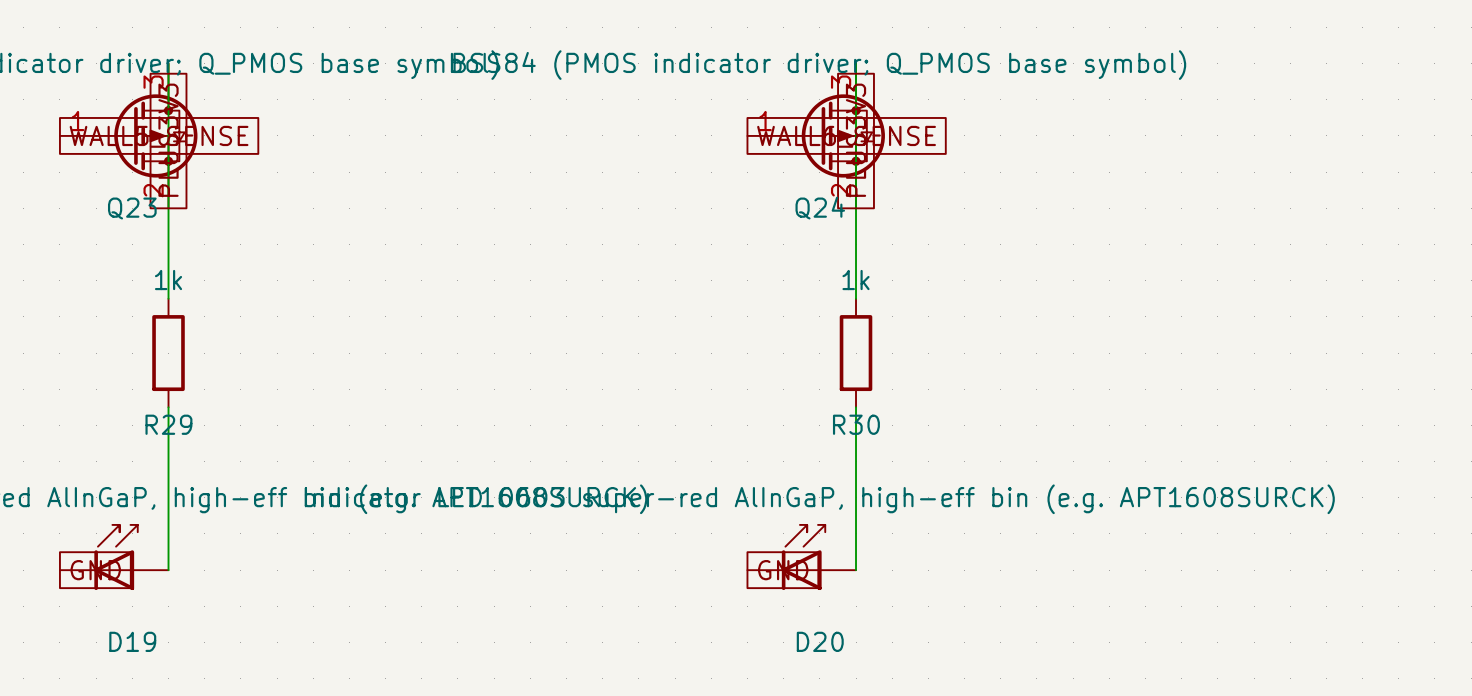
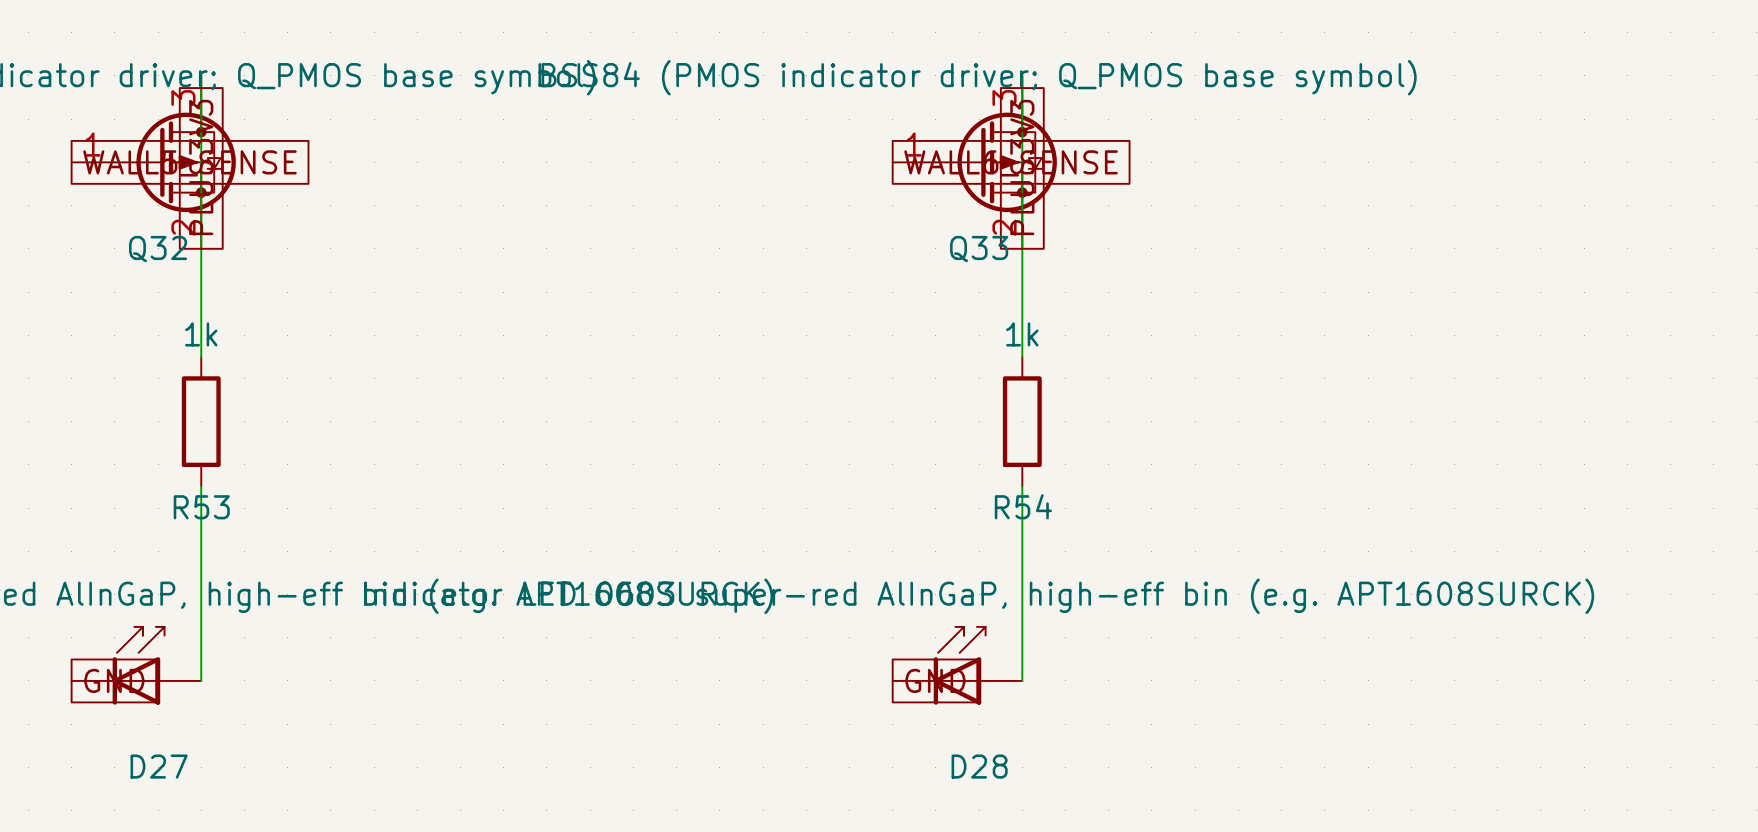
Q23 name: Q23 (132, 208) -> Q32 (158, 249)
Q24 name: Q24 (820, 208) -> Q33 (979, 249)
R29 name: R29 (168, 424) -> R53 (201, 507)
R30 name: R30 (856, 424) -> R54 (1023, 506)
D19 name: D19 (132, 641) -> D27 (159, 766)
D20 name: D20 (820, 641) -> D28 (979, 766)

